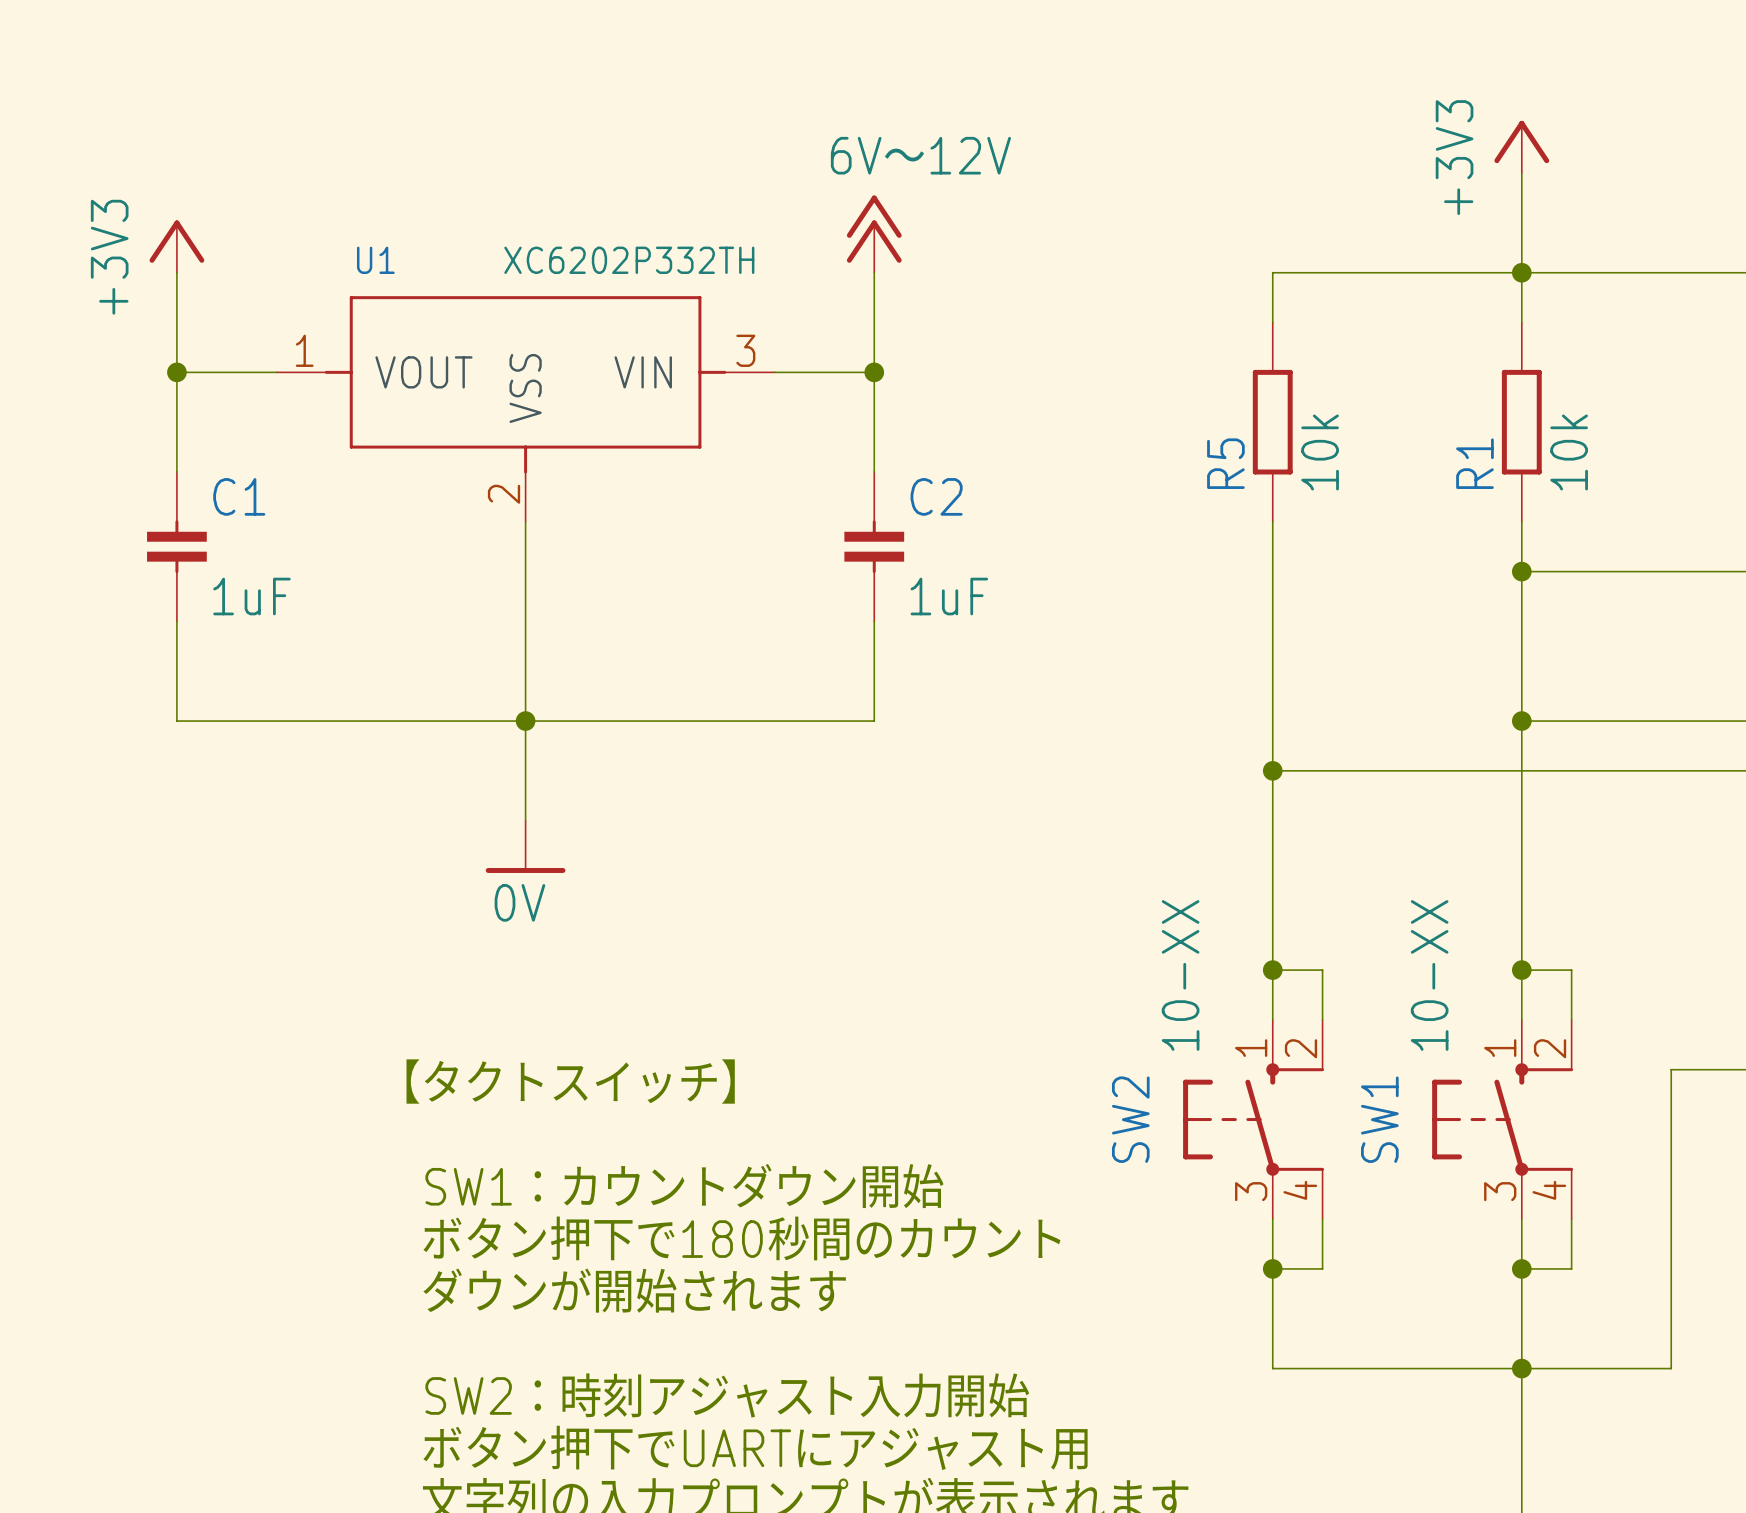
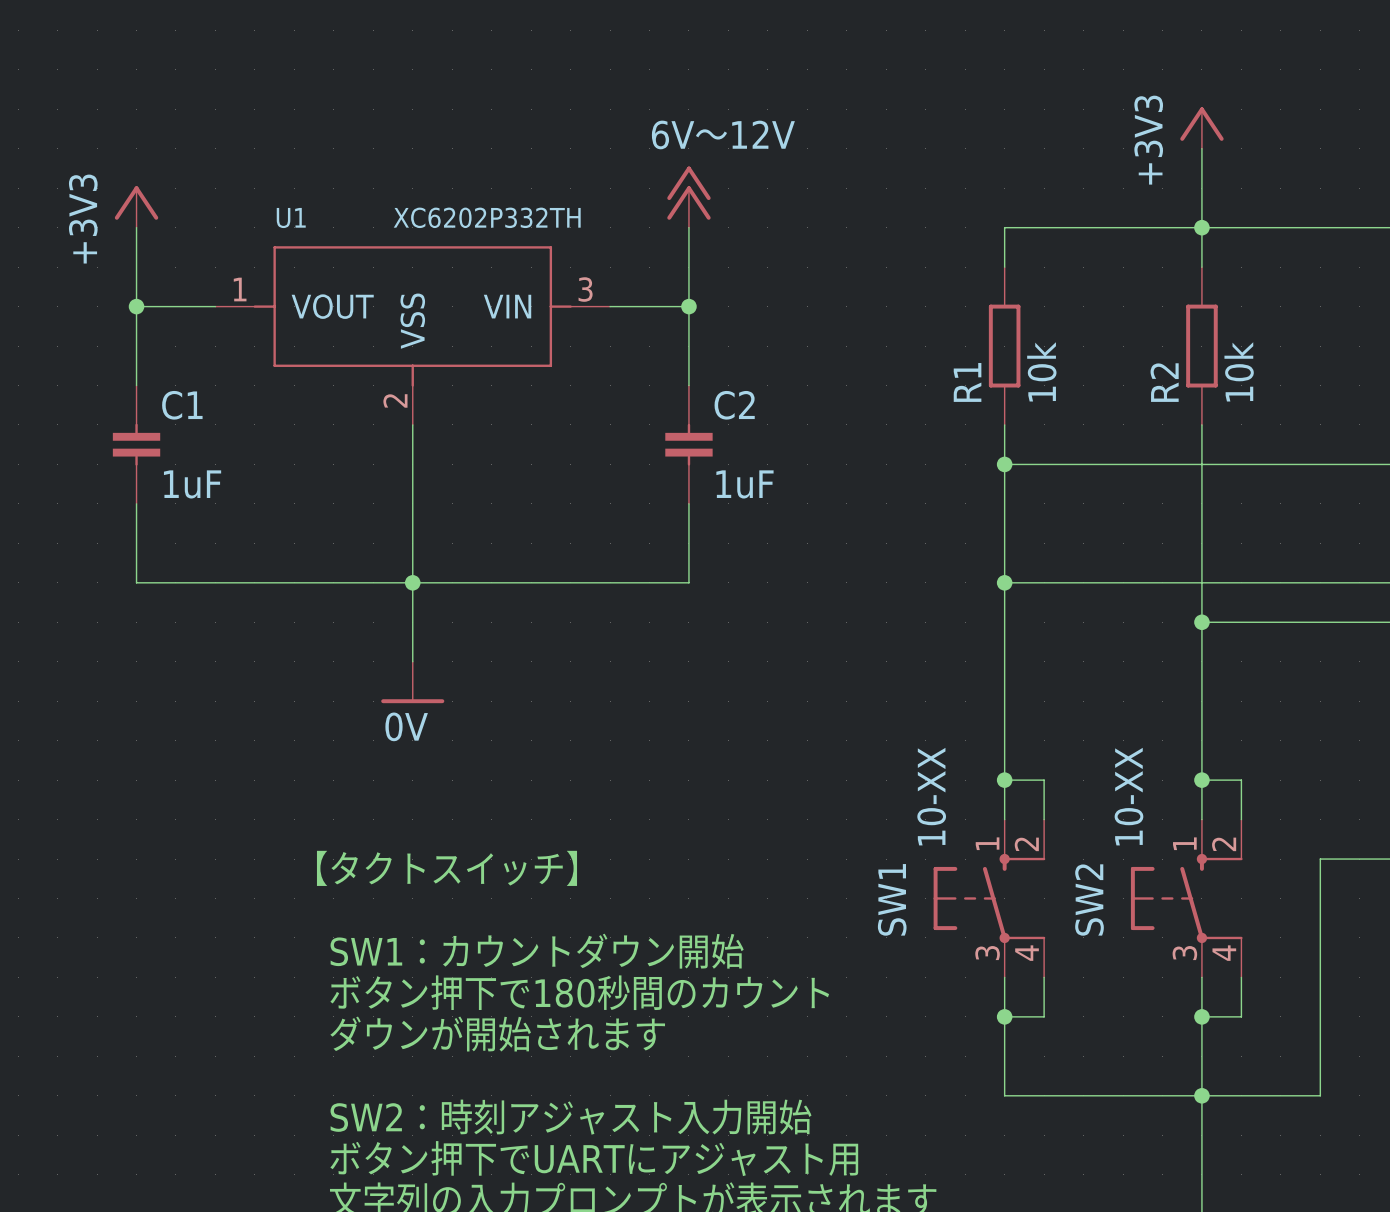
R5 name: R5 (1225, 463) -> R1 (967, 382)
R1 name: R1 (1474, 463) -> R2 (1164, 382)
wire: none -> (1004, 464) (1201, 464)
junction: none -> (1004, 464)
junction: (1521, 571) -> none
junction position: (1521, 721) -> (1201, 622)
wire: (1272, 770) (1521, 770) -> (1004, 582) (1201, 582)
junction position: (1272, 770) -> (1004, 582)
SW2 name: SW2 (1130, 1119) -> SW1 (892, 899)
SW1 name: SW1 (1379, 1119) -> SW2 (1089, 900)

